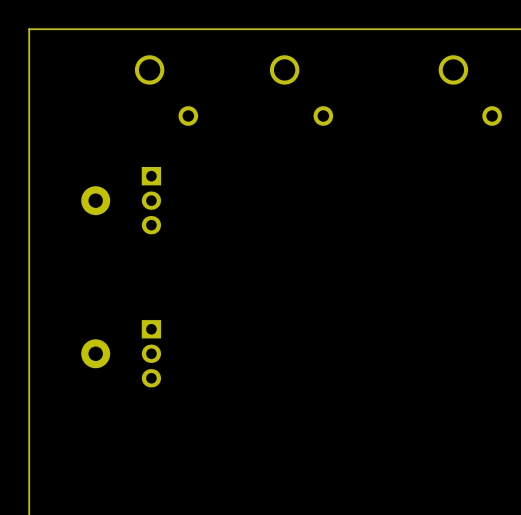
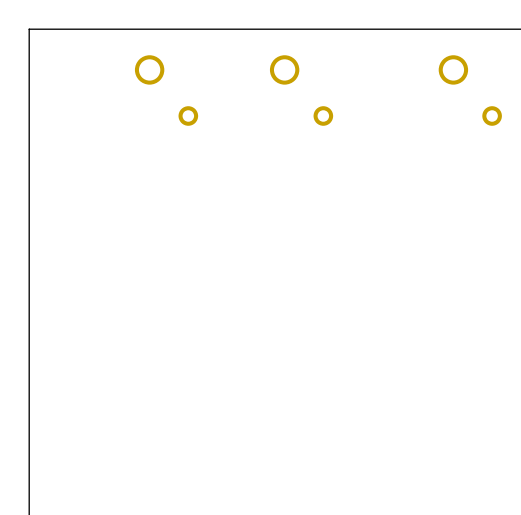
part: (95, 200) -> none
part: (151, 200) -> none
part: (95, 353) -> none
part: (151, 353) -> none

